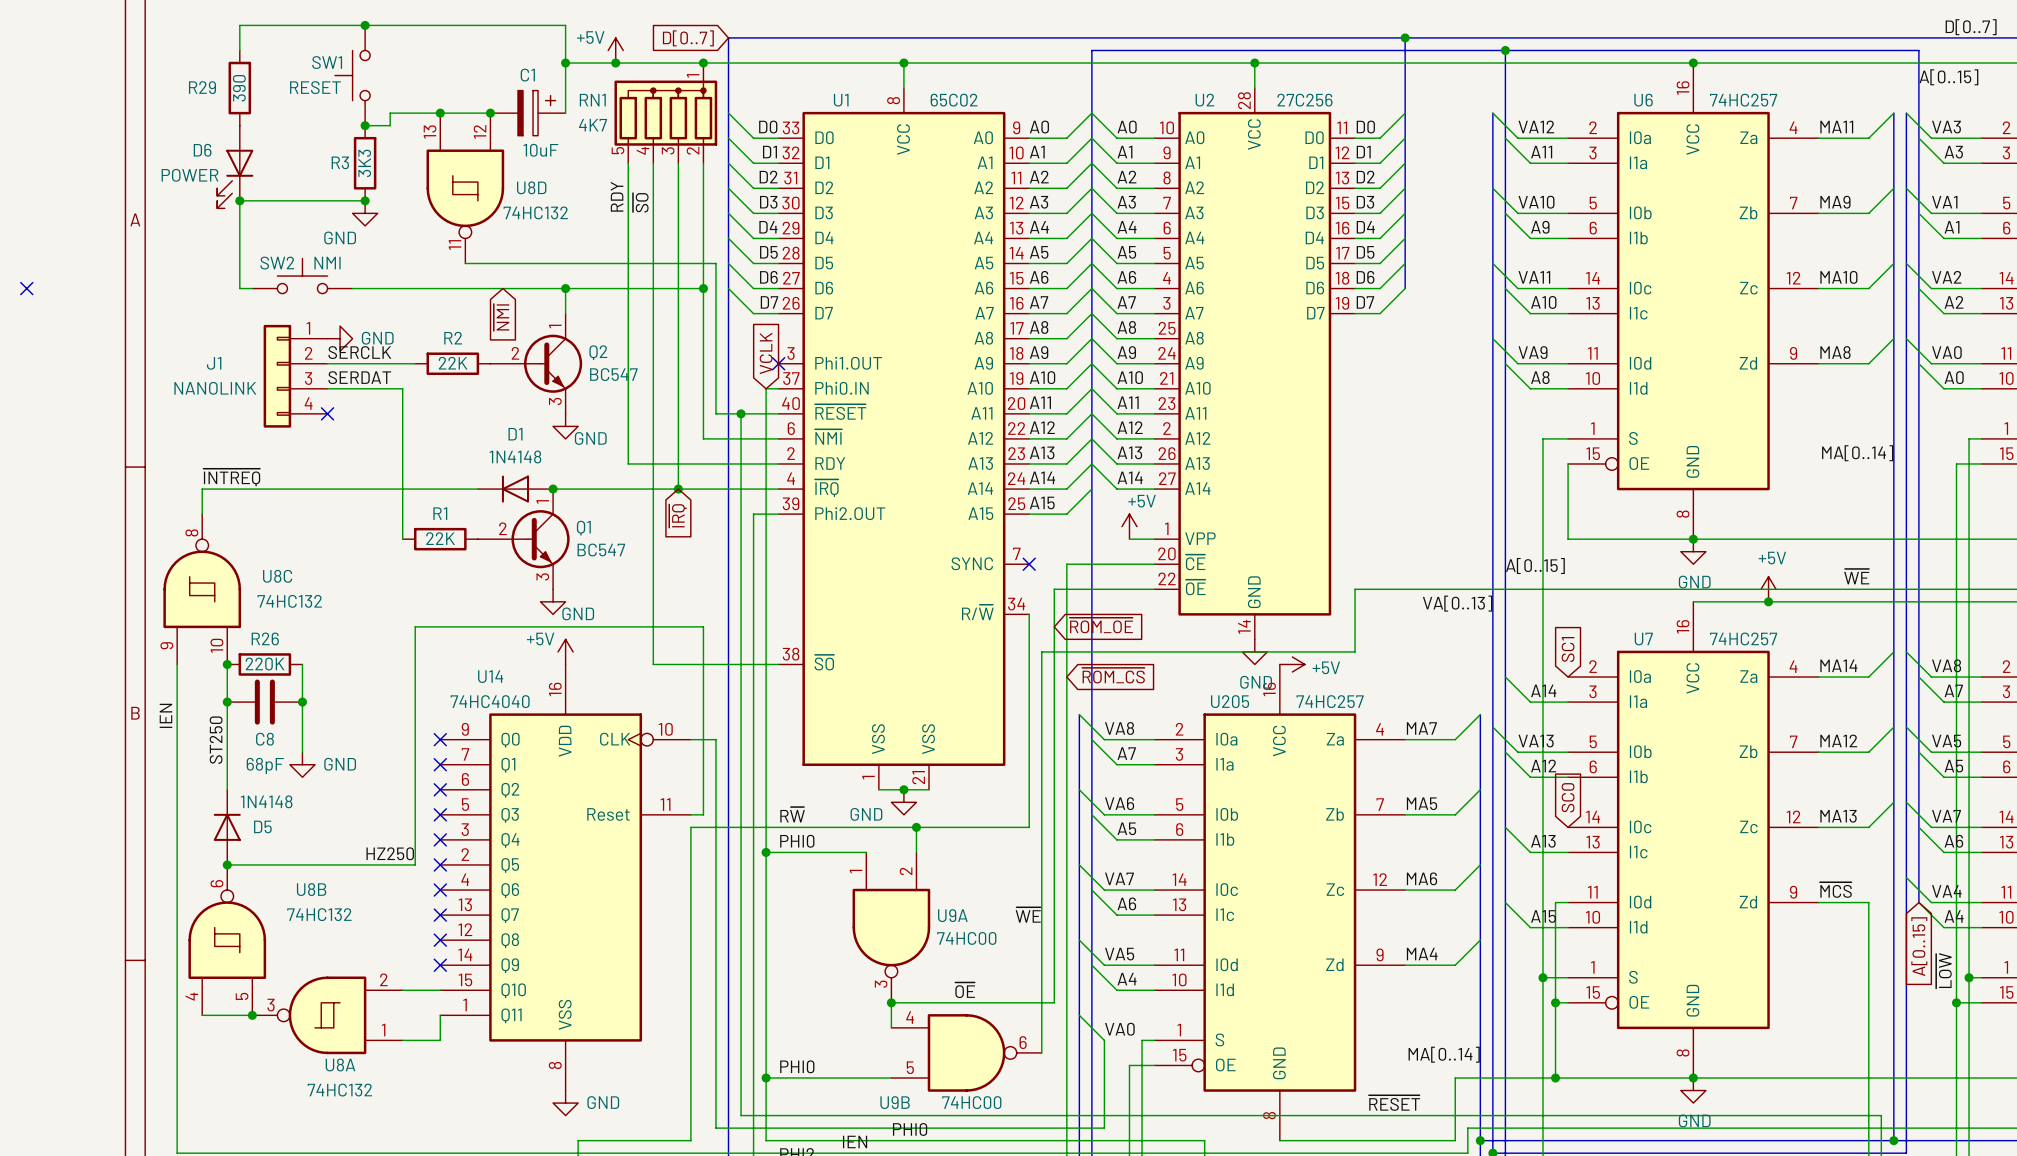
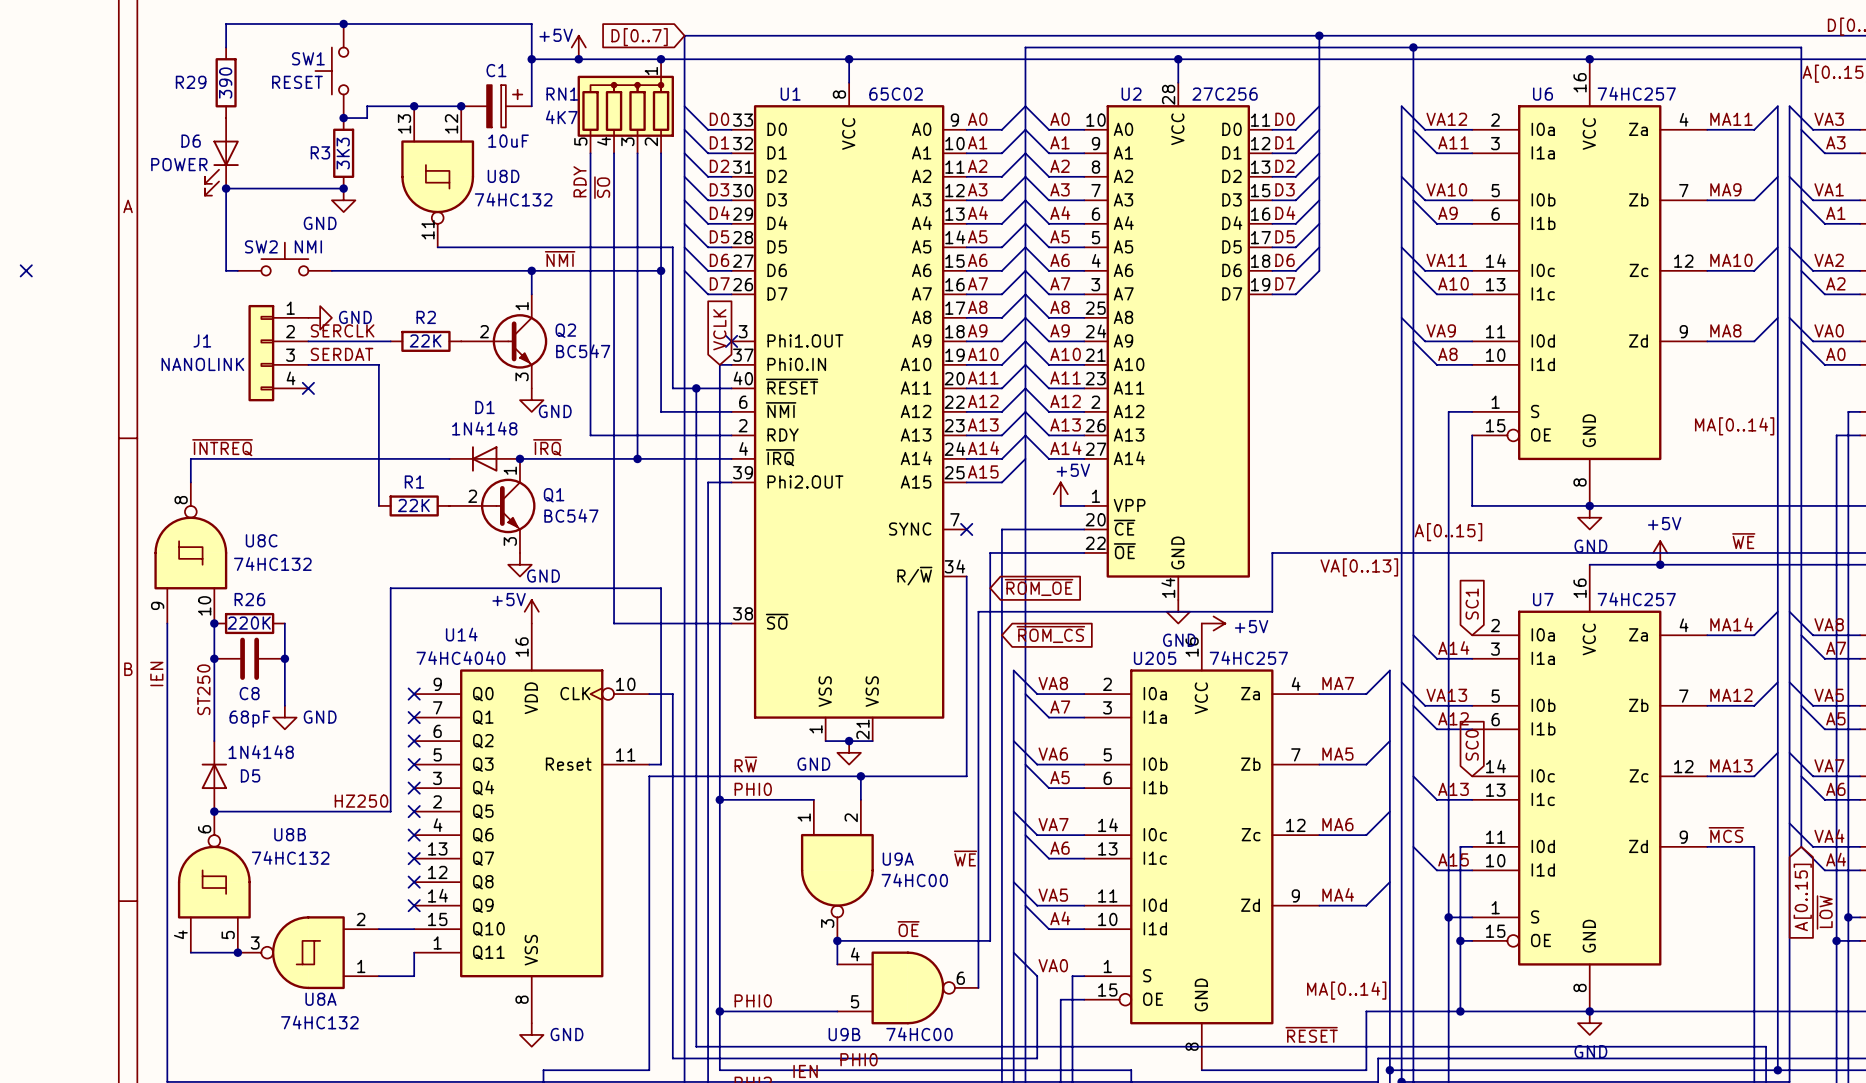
label: none -> ~{NMI} (560, 259)
global label: ~{NMI} (501, 317) -> none
label: none -> ~{IRQ} (547, 447)
global label: ~{IRQ} (677, 515) -> none

